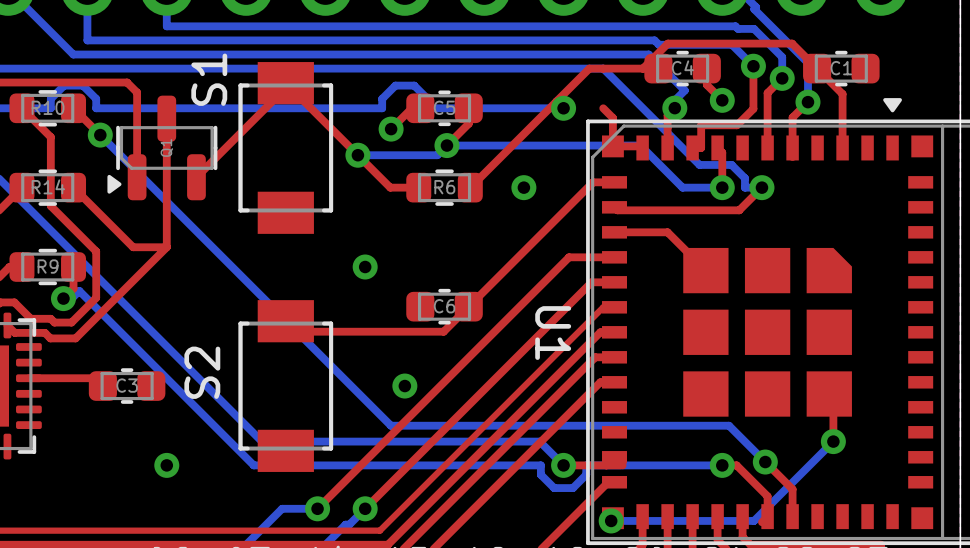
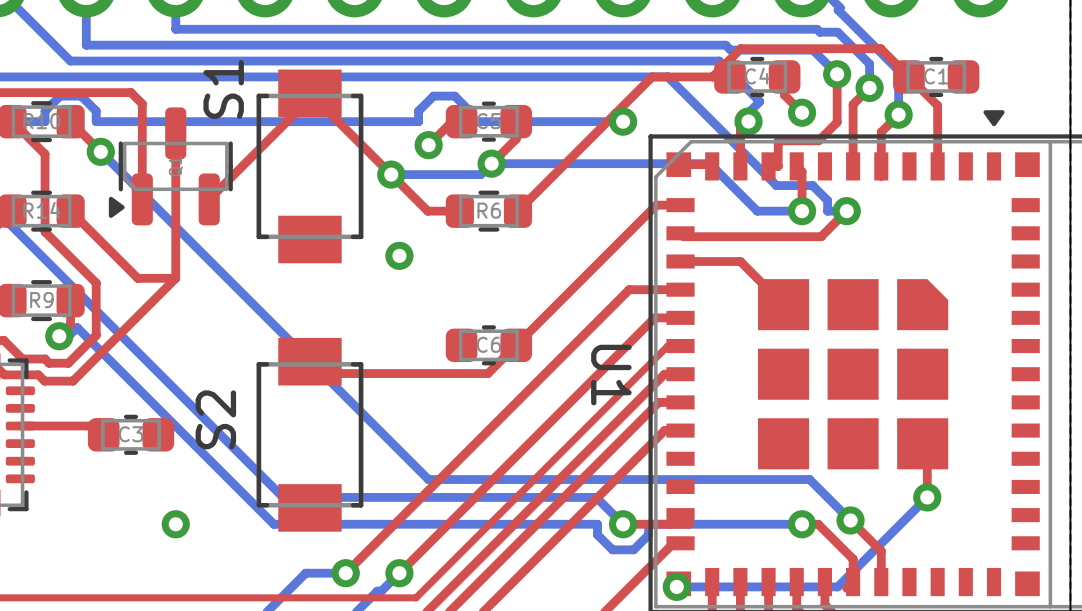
top track: (603, 108) (612, 117) (612, 146) -> none
via: (523, 187) -> none
via position: (365, 267) -> (399, 255)
via: (404, 386) -> none

